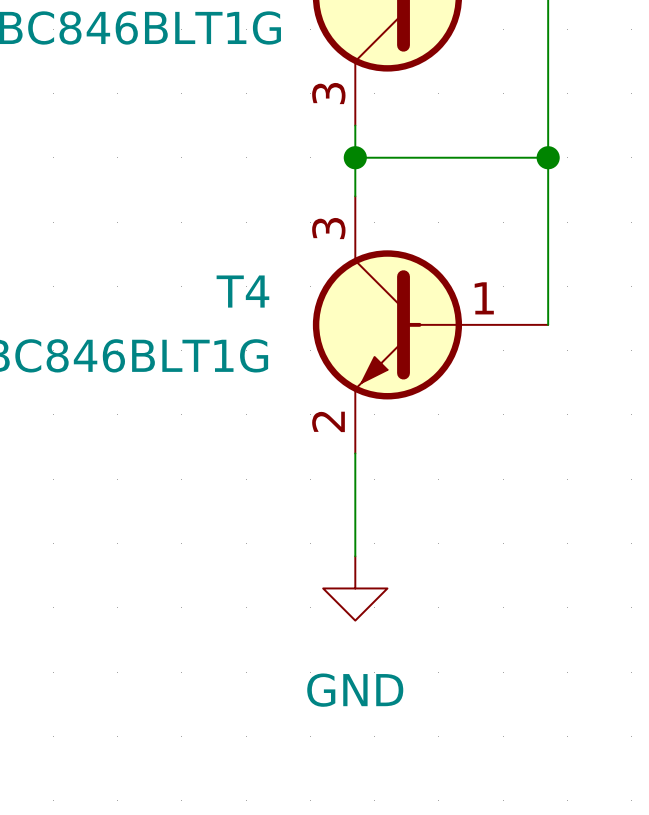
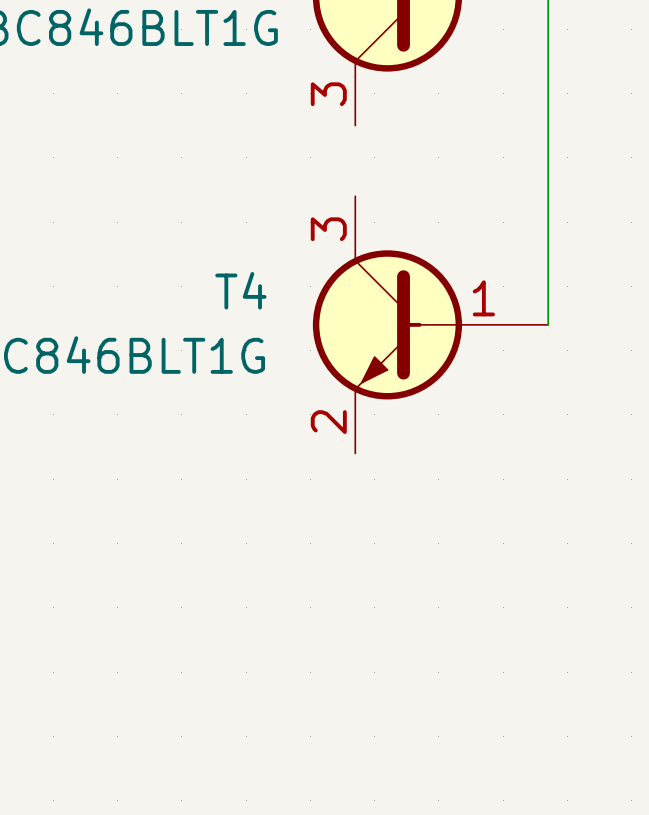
wire: (355, 125) (355, 196) -> none
wire: (355, 157) (548, 157) -> none
junction: (355, 157) -> none
junction: (548, 157) -> none
wire: (355, 453) (355, 556) -> none
power symbol: GND (355, 588) -> none

